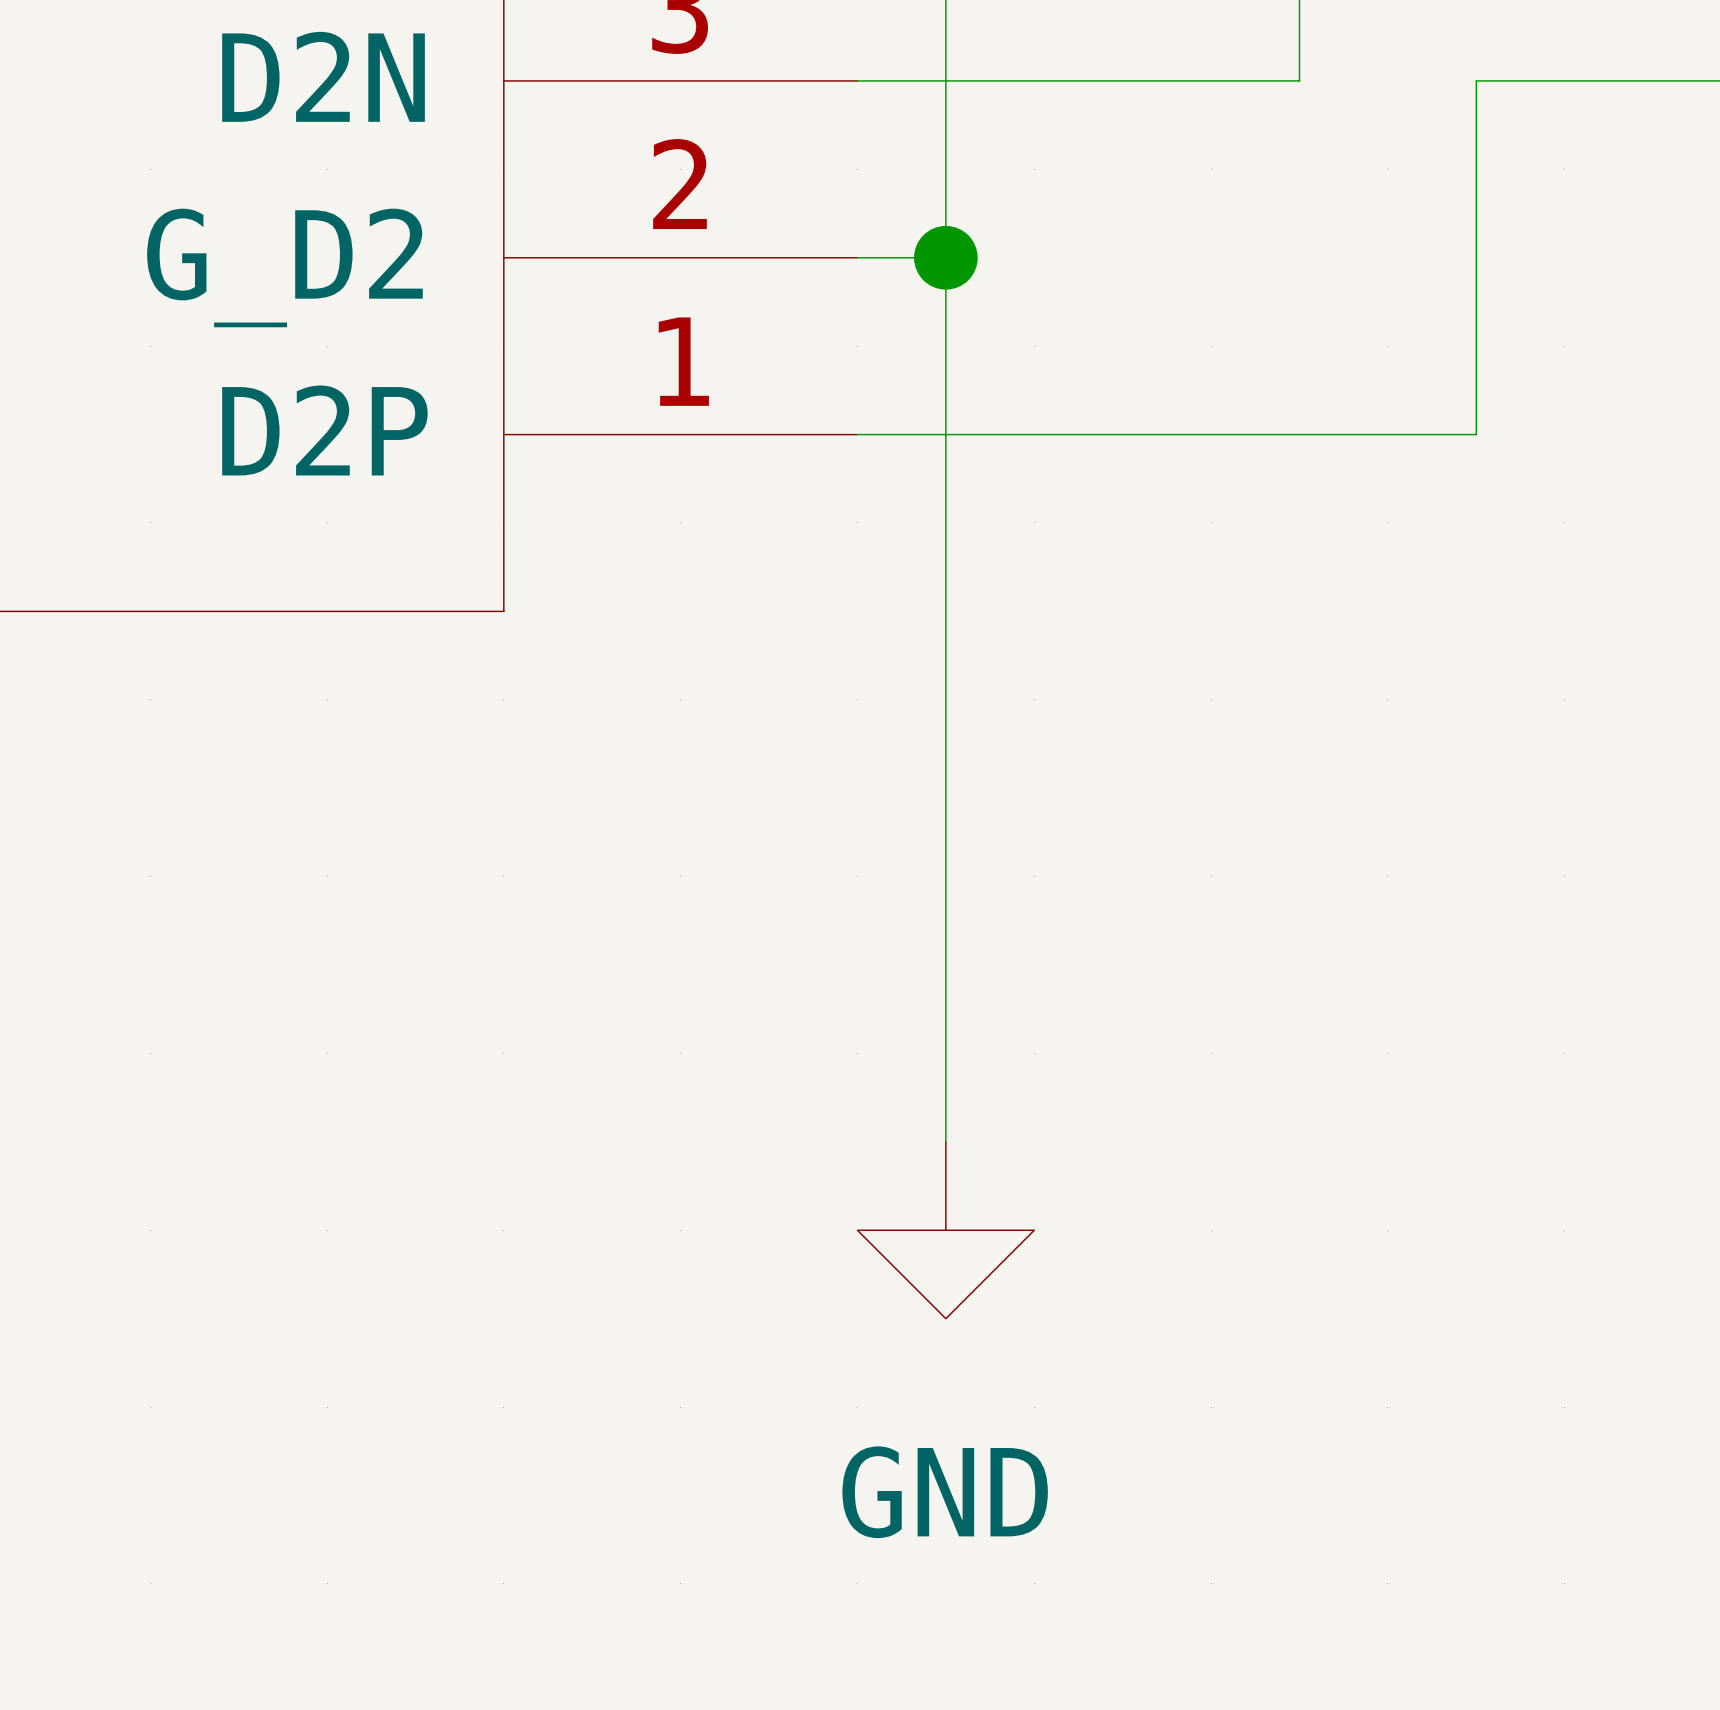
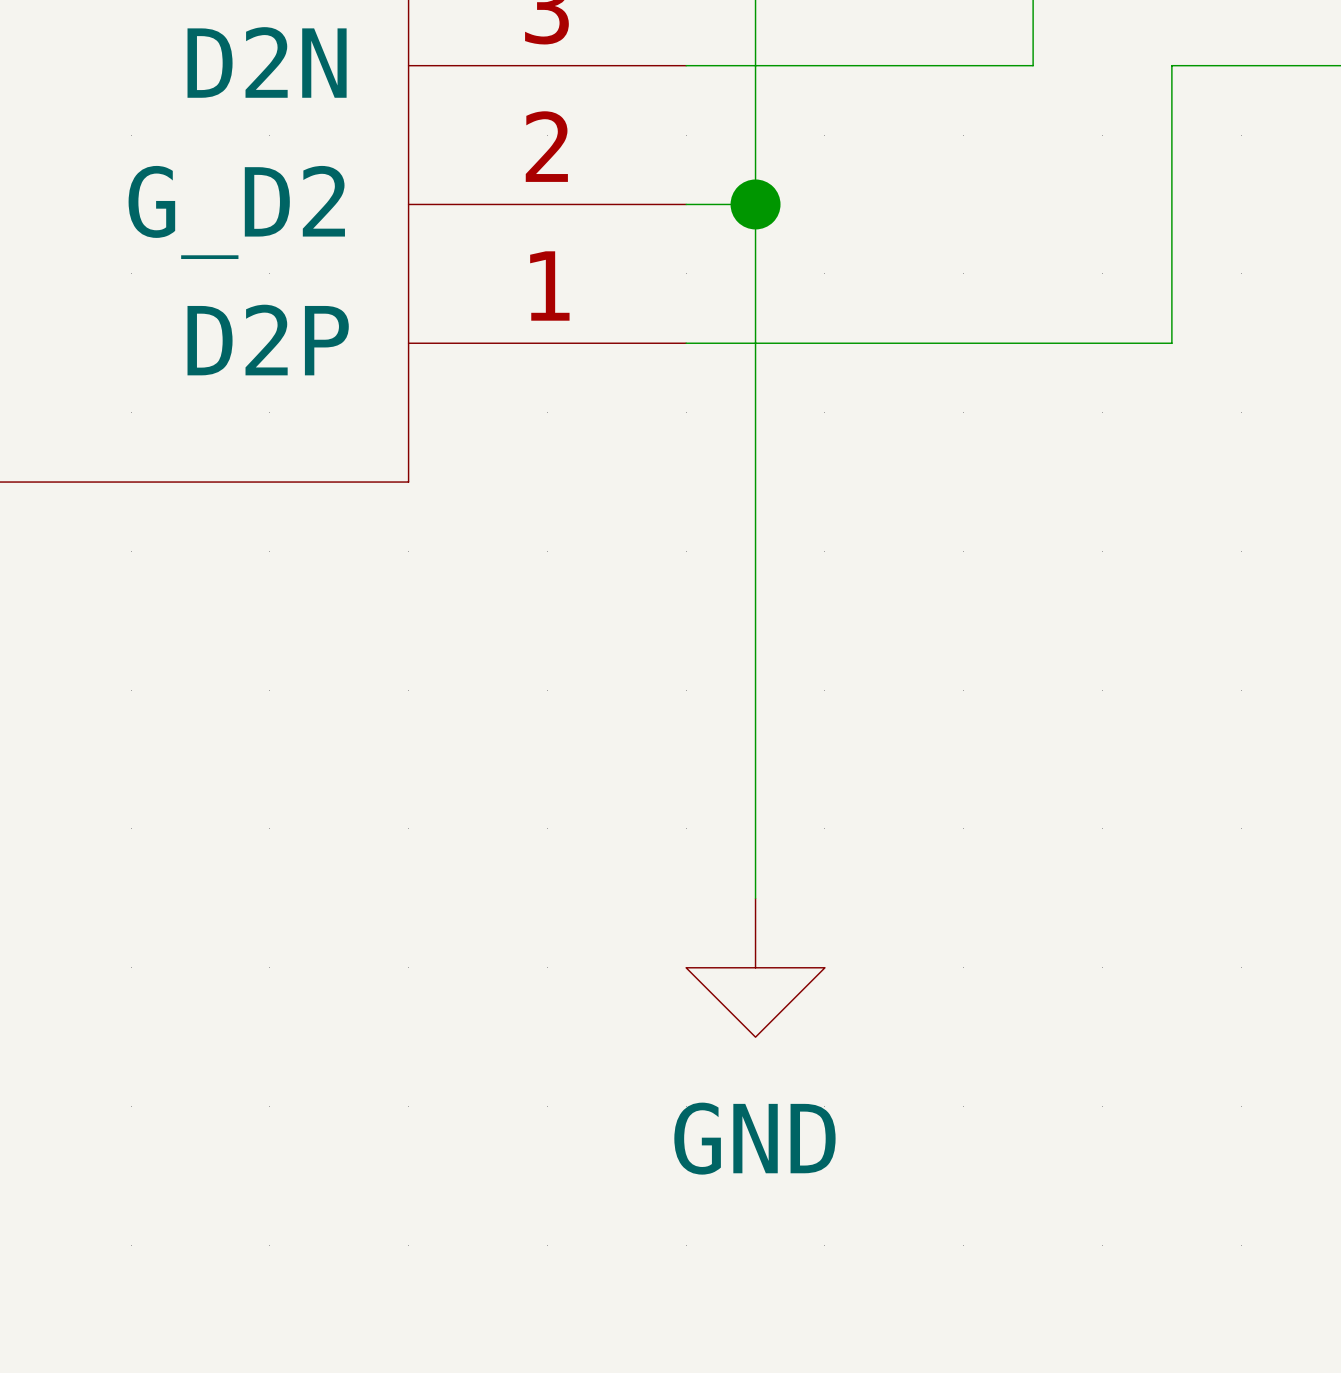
power symbol text position: GND (945, 1492) -> GND (754, 1138)

